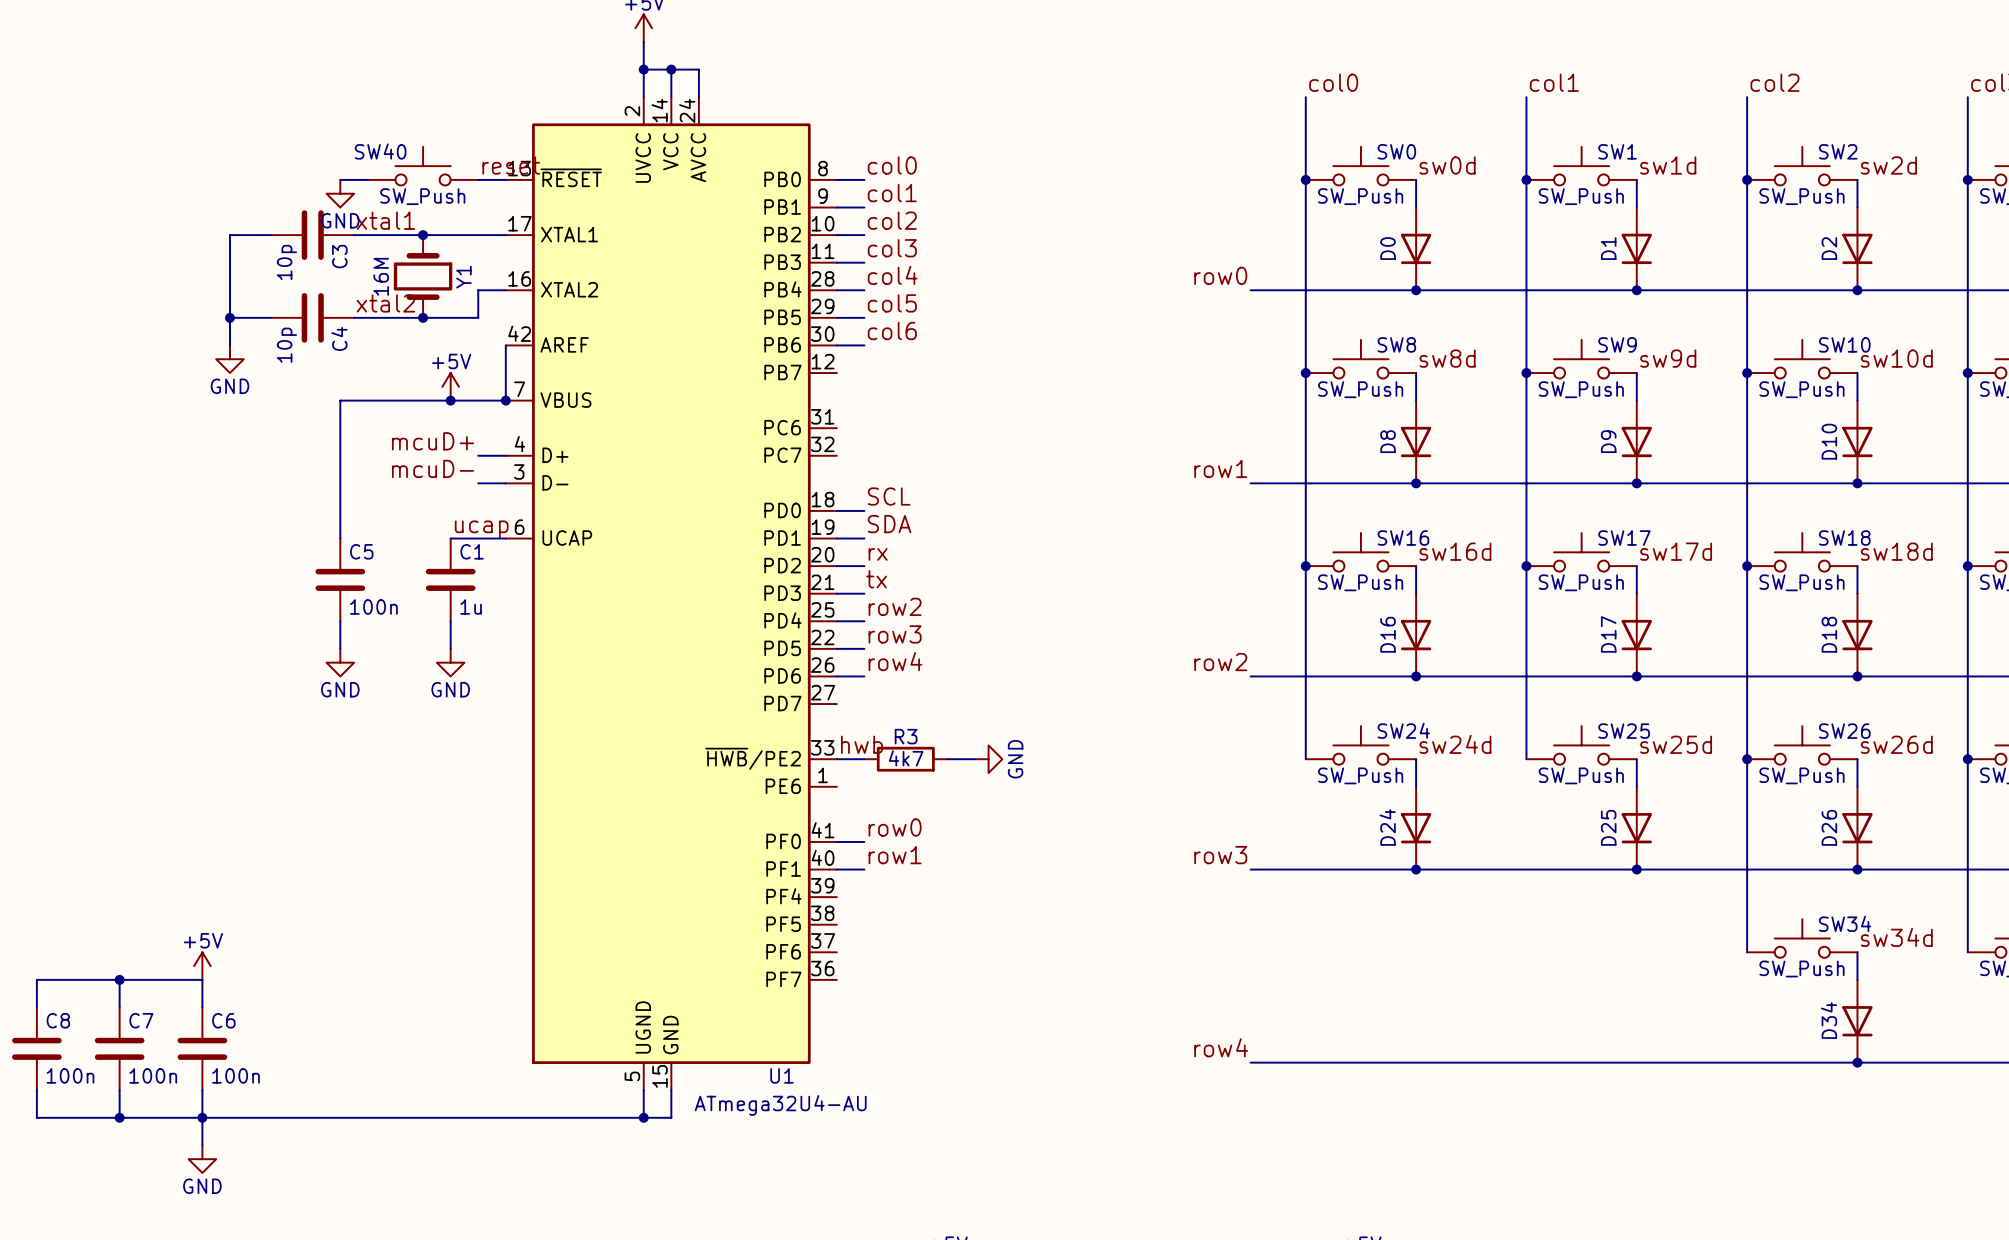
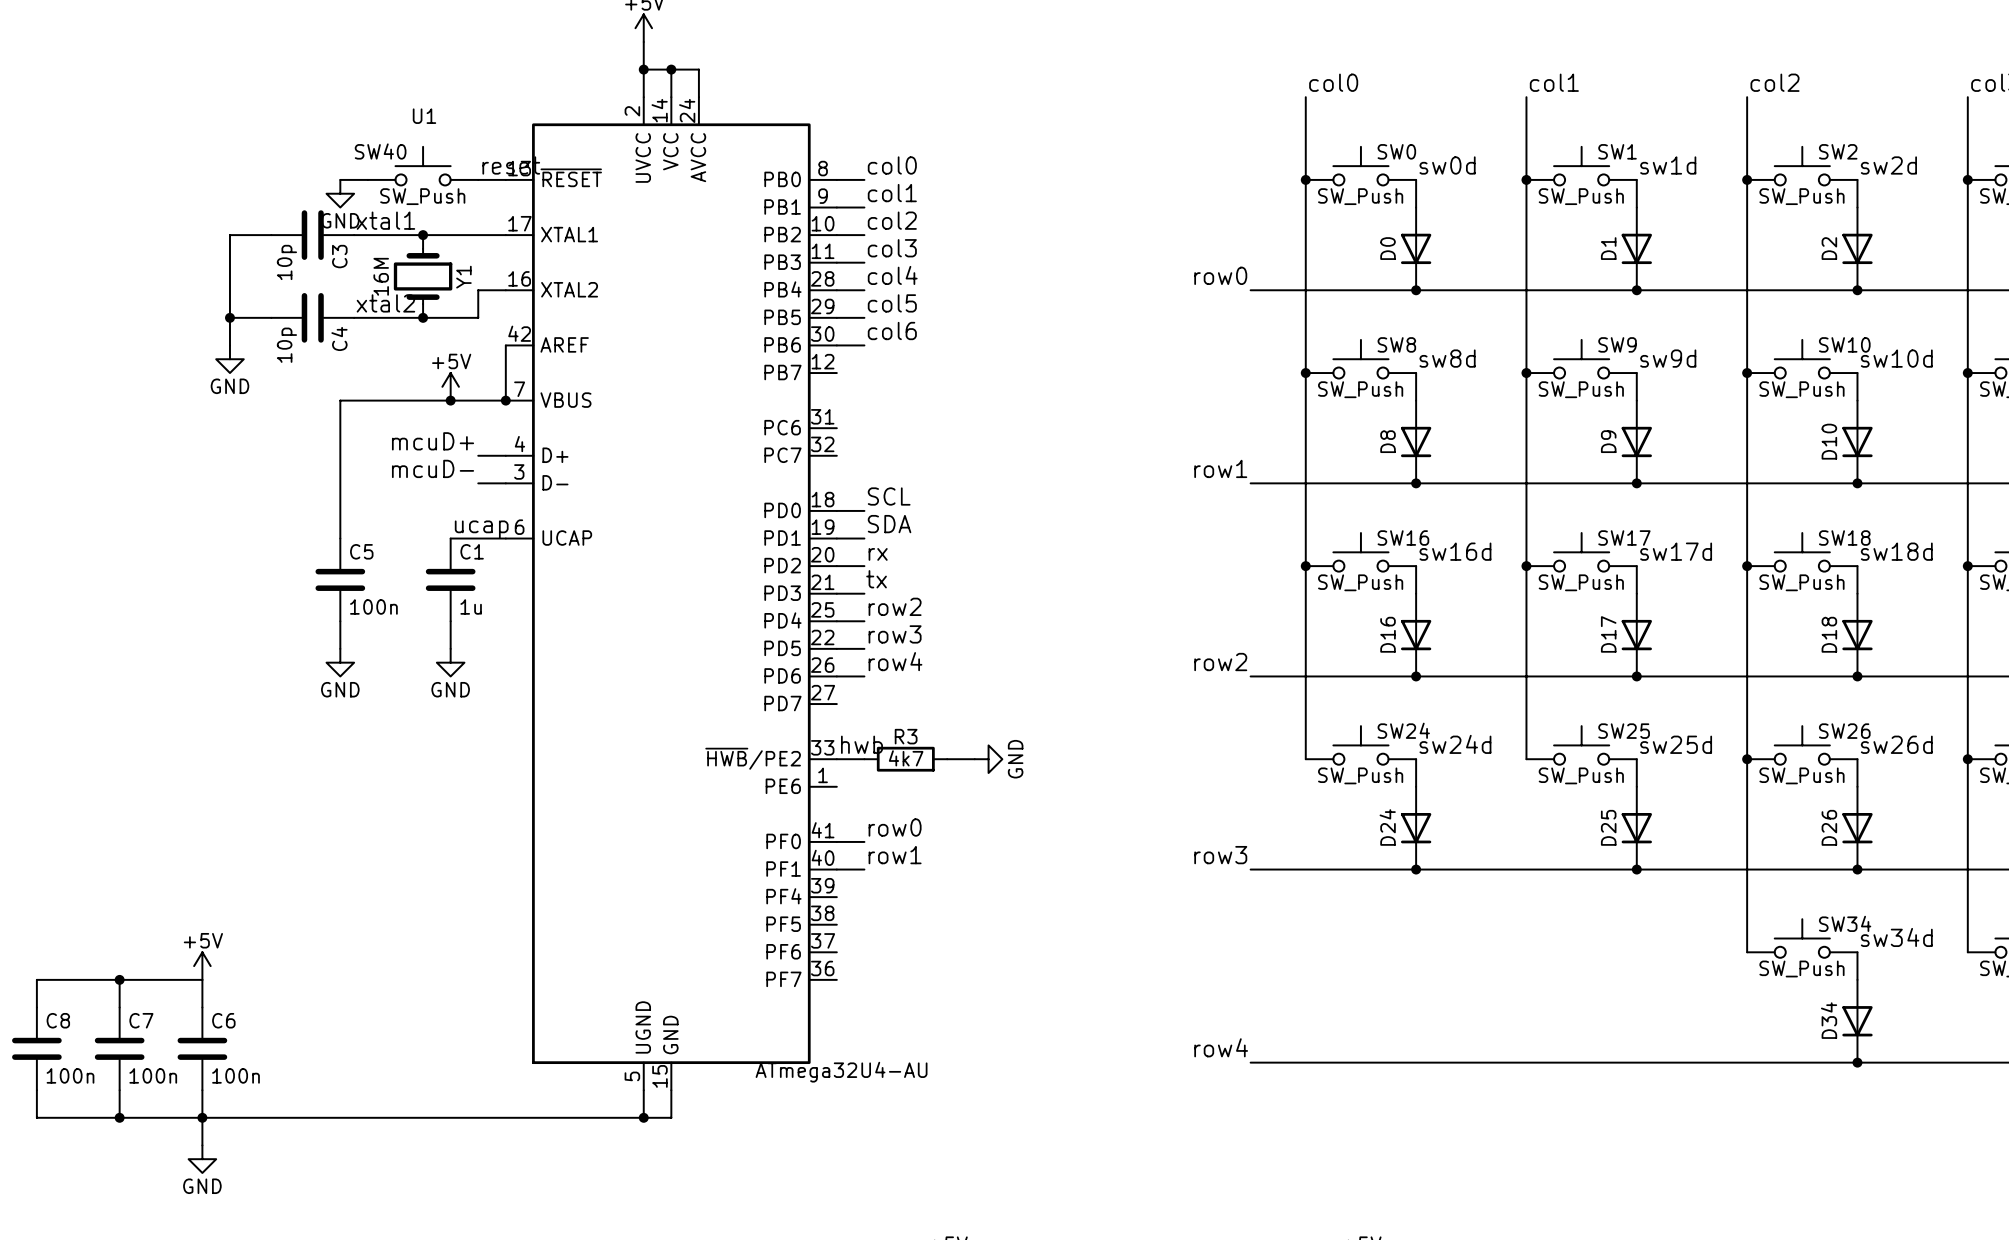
U1 name position: U1 (782, 1075) -> U1 (424, 116)
U1 value position: ATmega32U4-AU (780, 1105) -> ATmega32U4-AU (841, 1072)

